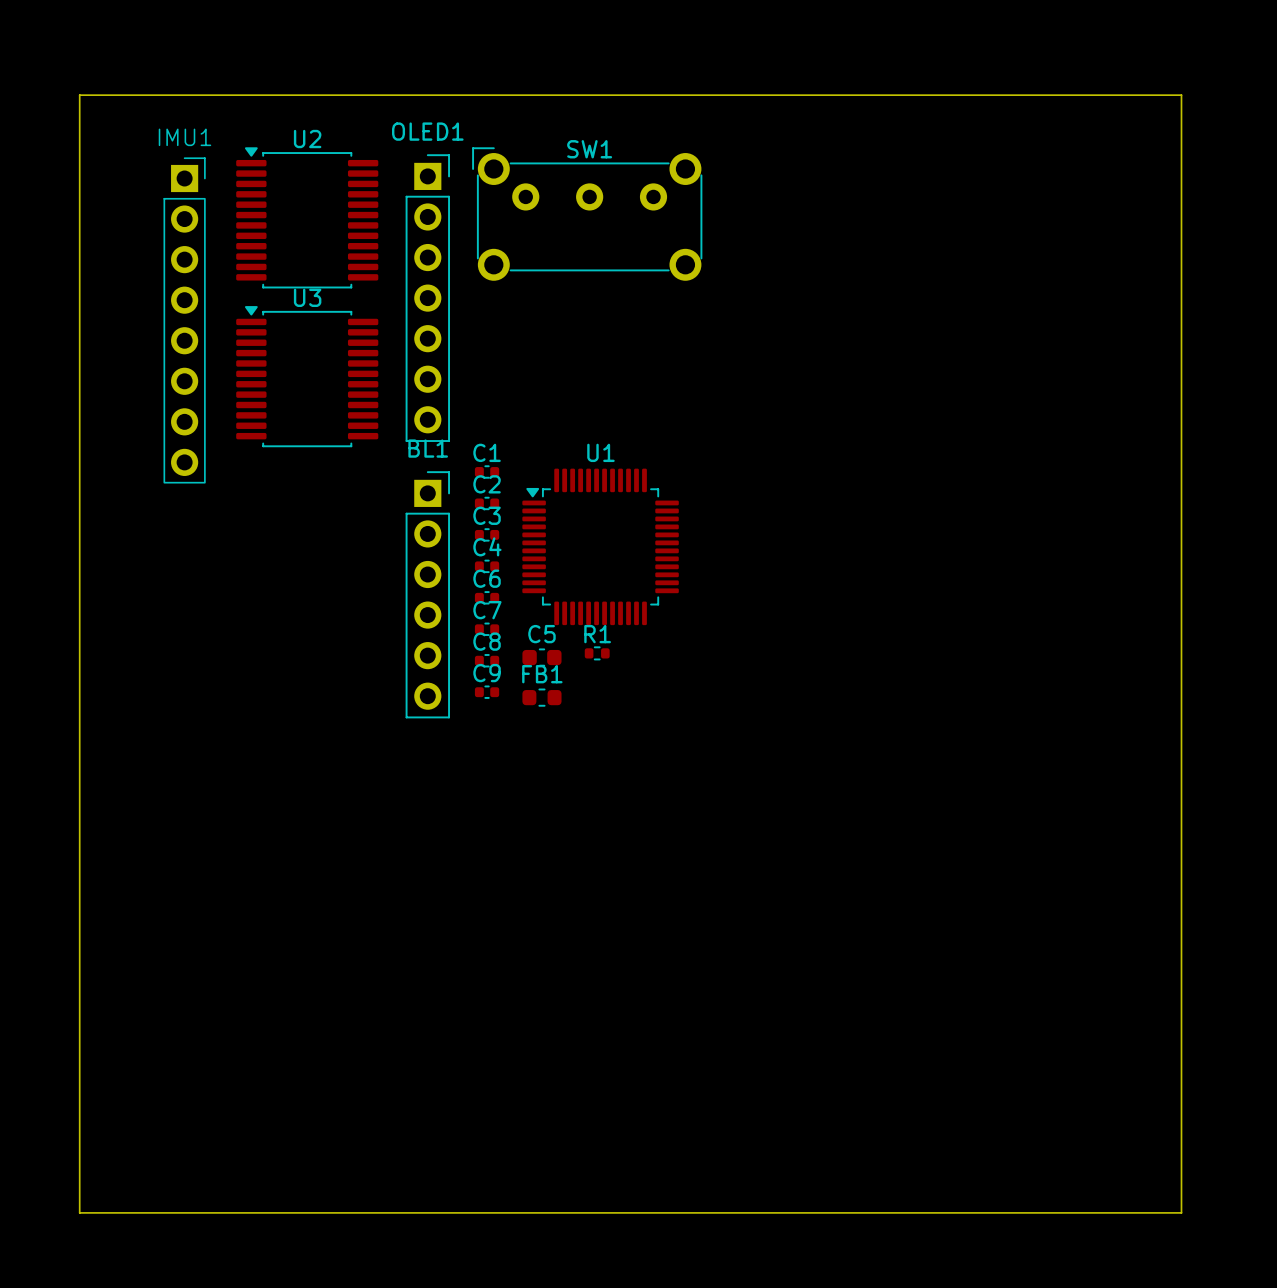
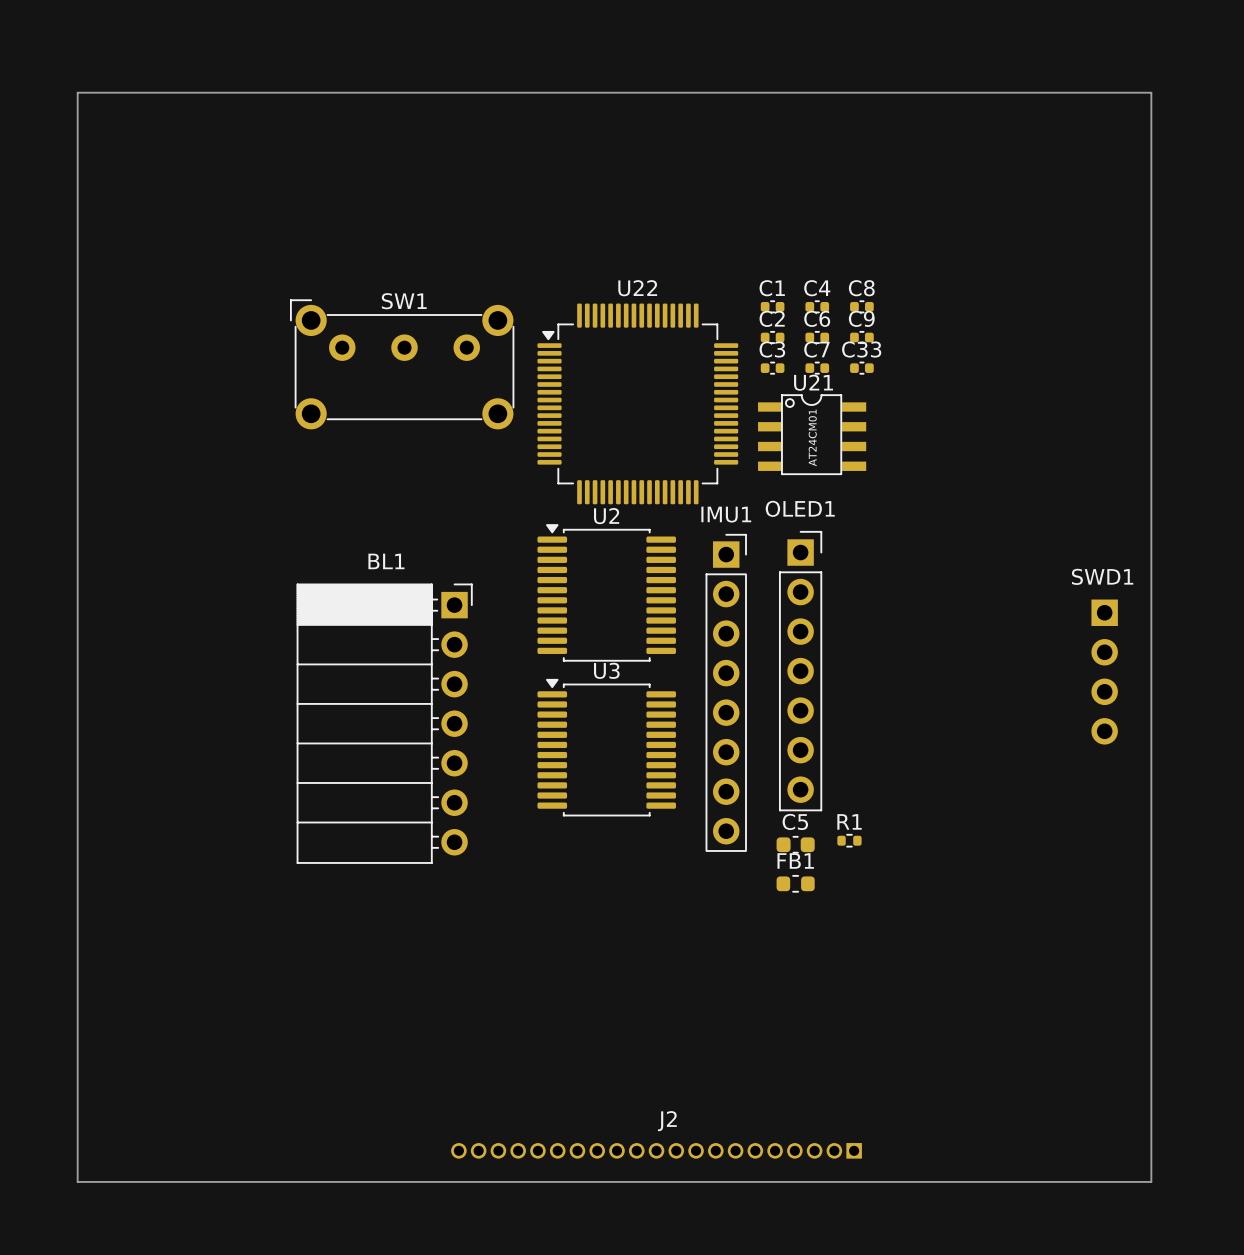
SW1 position: (587, 214) -> (402, 364)
U2 position: (307, 217) -> (606, 592)
OLED1 position: (427, 298) -> (800, 671)
IMU1 position: (184, 320) -> (726, 692)
U3 position: (307, 376) -> (606, 747)
C33: none -> (861, 368)
U22: none -> (637, 403)
U21: none -> (812, 434)
BL1 footprint: [405, 471, 451, 719] -> [296, 583, 473, 864]
C1 position: (487, 471) -> (772, 306)
C2 position: (487, 503) -> (772, 337)
C3 position: (487, 534) -> (772, 368)
U1: (600, 546) -> none
C4 position: (487, 566) -> (817, 306)
C6 position: (487, 597) -> (817, 337)
C7 position: (487, 629) -> (817, 368)
R1 position: (597, 653) -> (849, 840)
C5 position: (541, 657) -> (795, 844)
C8 position: (487, 660) -> (861, 306)
SWD1: none -> (1104, 672)
C9 position: (487, 692) -> (861, 337)
FB1 position: (541, 697) -> (795, 883)
J2: none -> (656, 1150)

